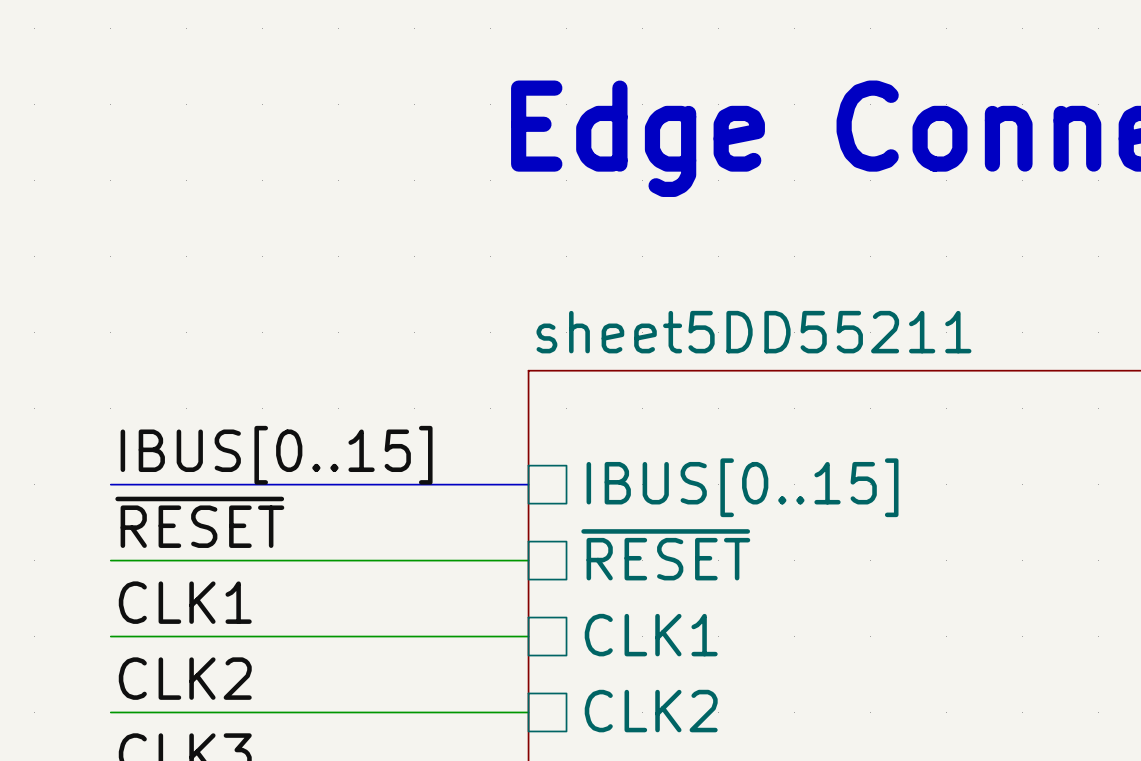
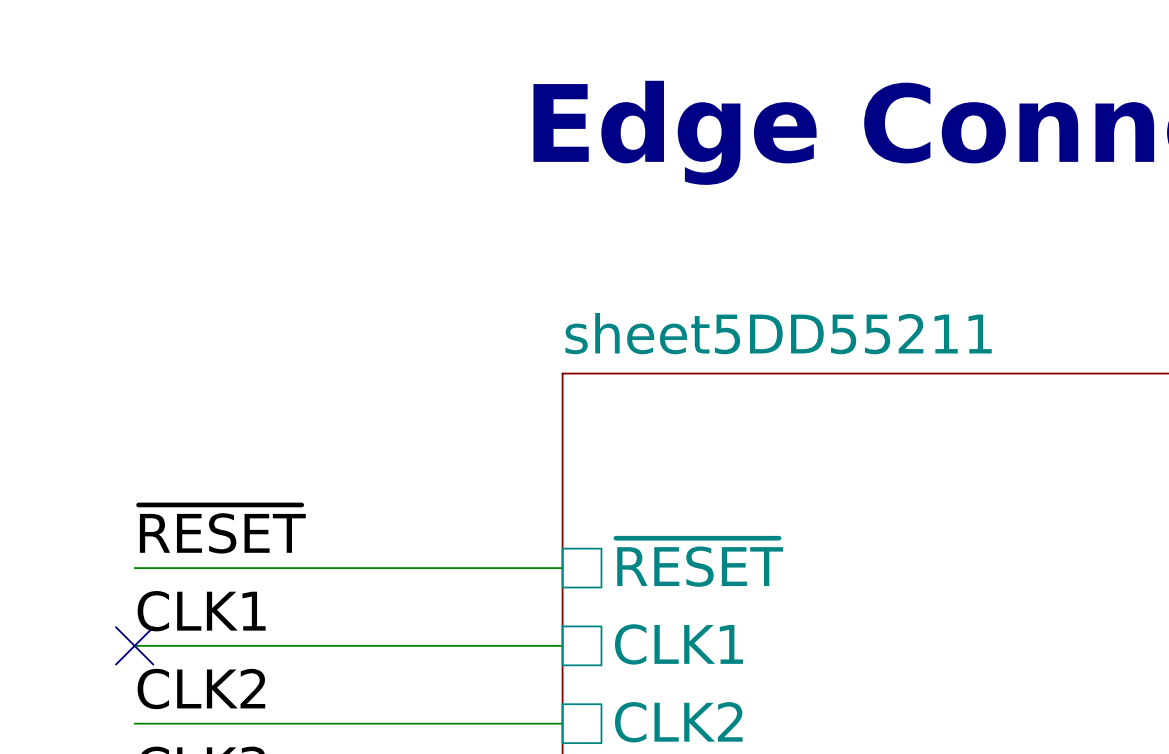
label: IBUS[0..15] (276, 455) -> none
bus: (110, 484) (528, 484) -> none
sheet pin: IBUS[0..15] (742, 487) -> none
no-connect mark: none -> (134, 645)

